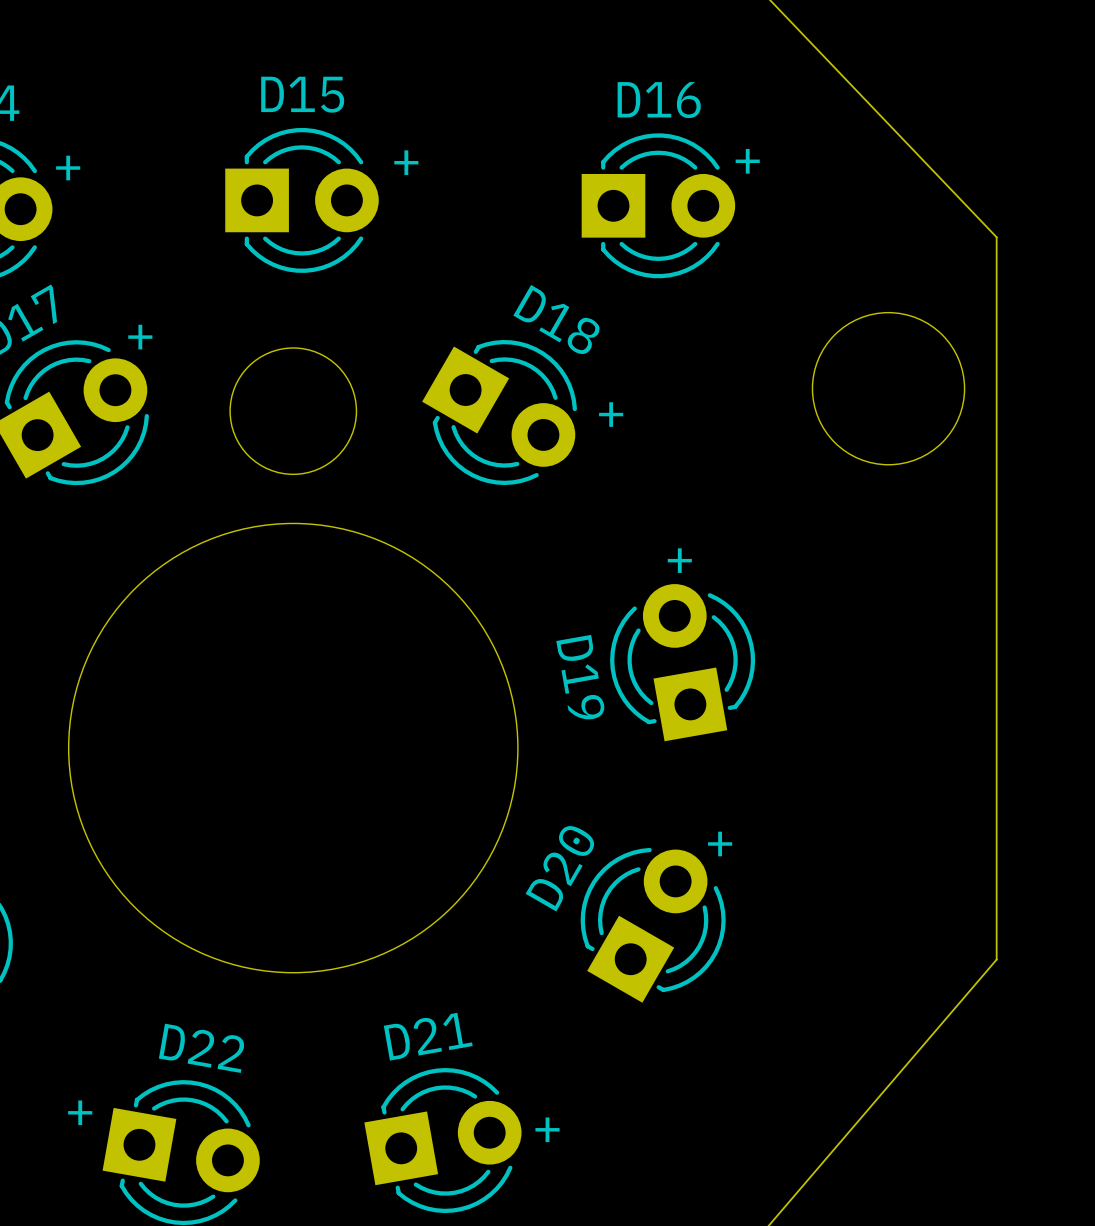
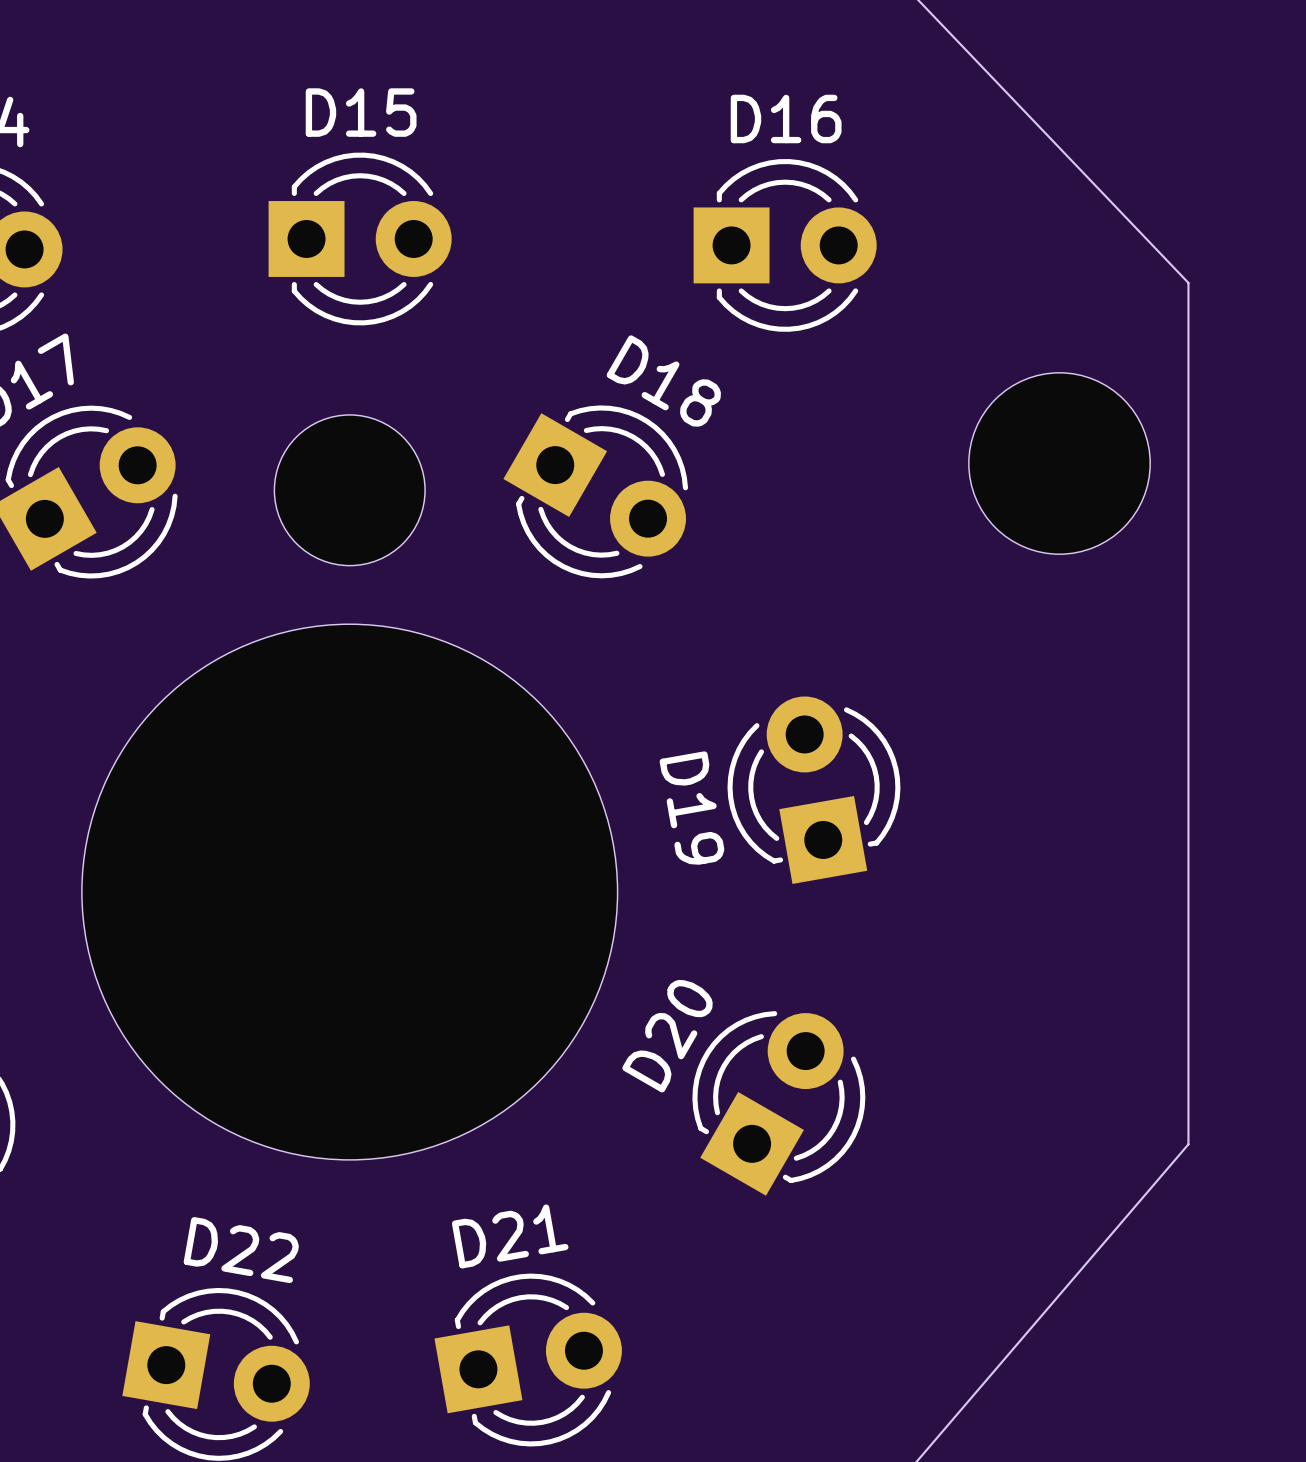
text: + (747, 161) -> none
text: + (406, 162) -> none
text: + (68, 168) -> none
text: + (140, 337) -> none
text: + (611, 414) -> none
text: + (679, 560) -> none
text: + (720, 843) -> none
text: + (80, 1112) -> none
text: + (547, 1129) -> none

